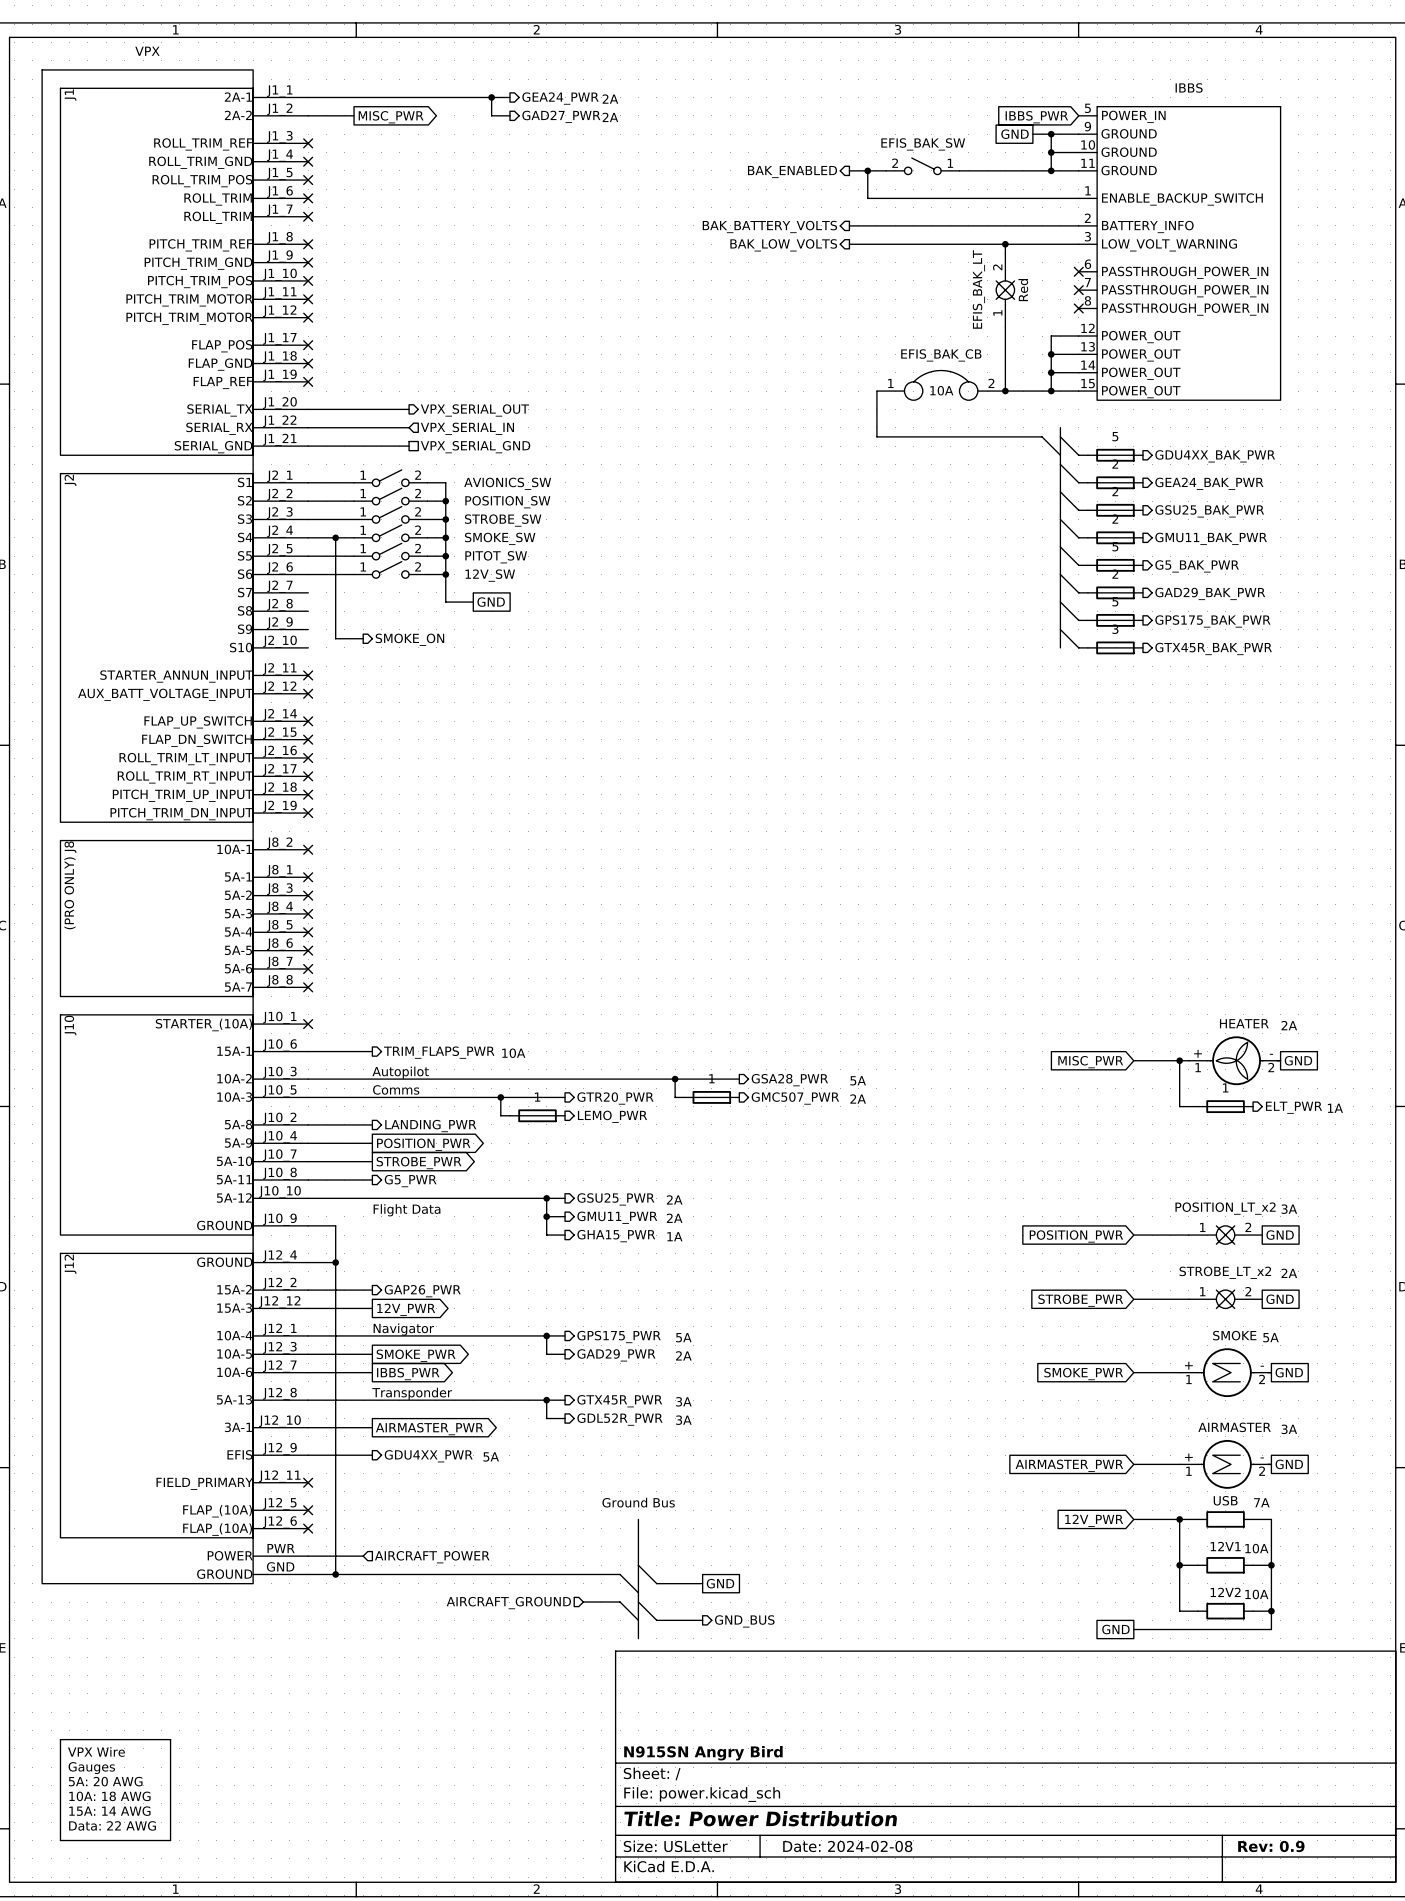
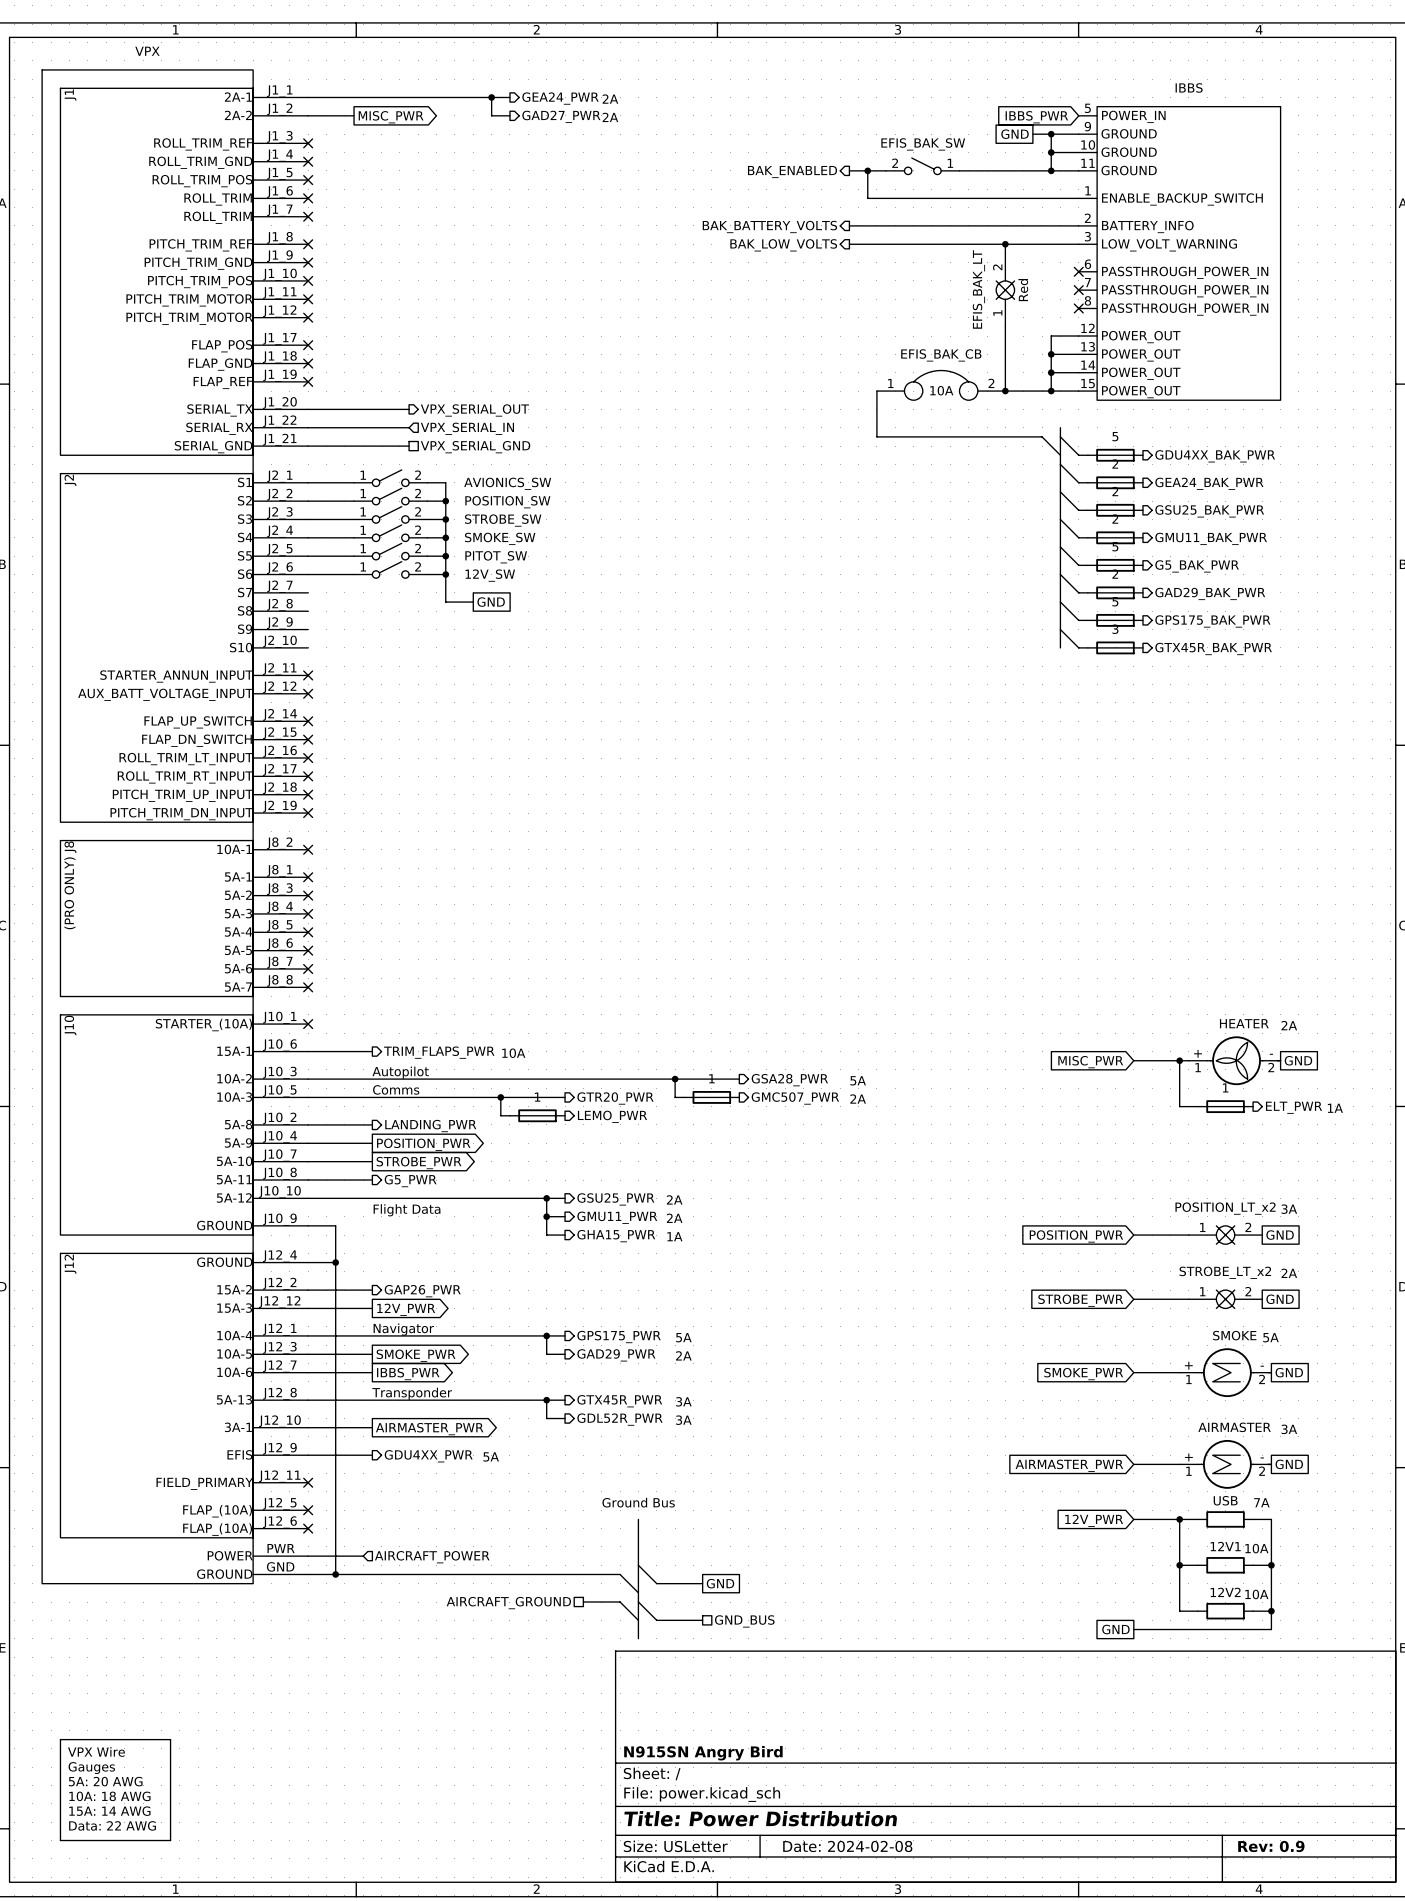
wire: (335, 537) (335, 638) (363, 638) -> none
junction: (335, 537) -> none
hierarchical label: SMOKE_ON (409, 639) -> none
hierarchical label shape: input (508, 1603) -> passive (508, 1603)
hierarchical label shape: output (744, 1621) -> passive (744, 1621)

